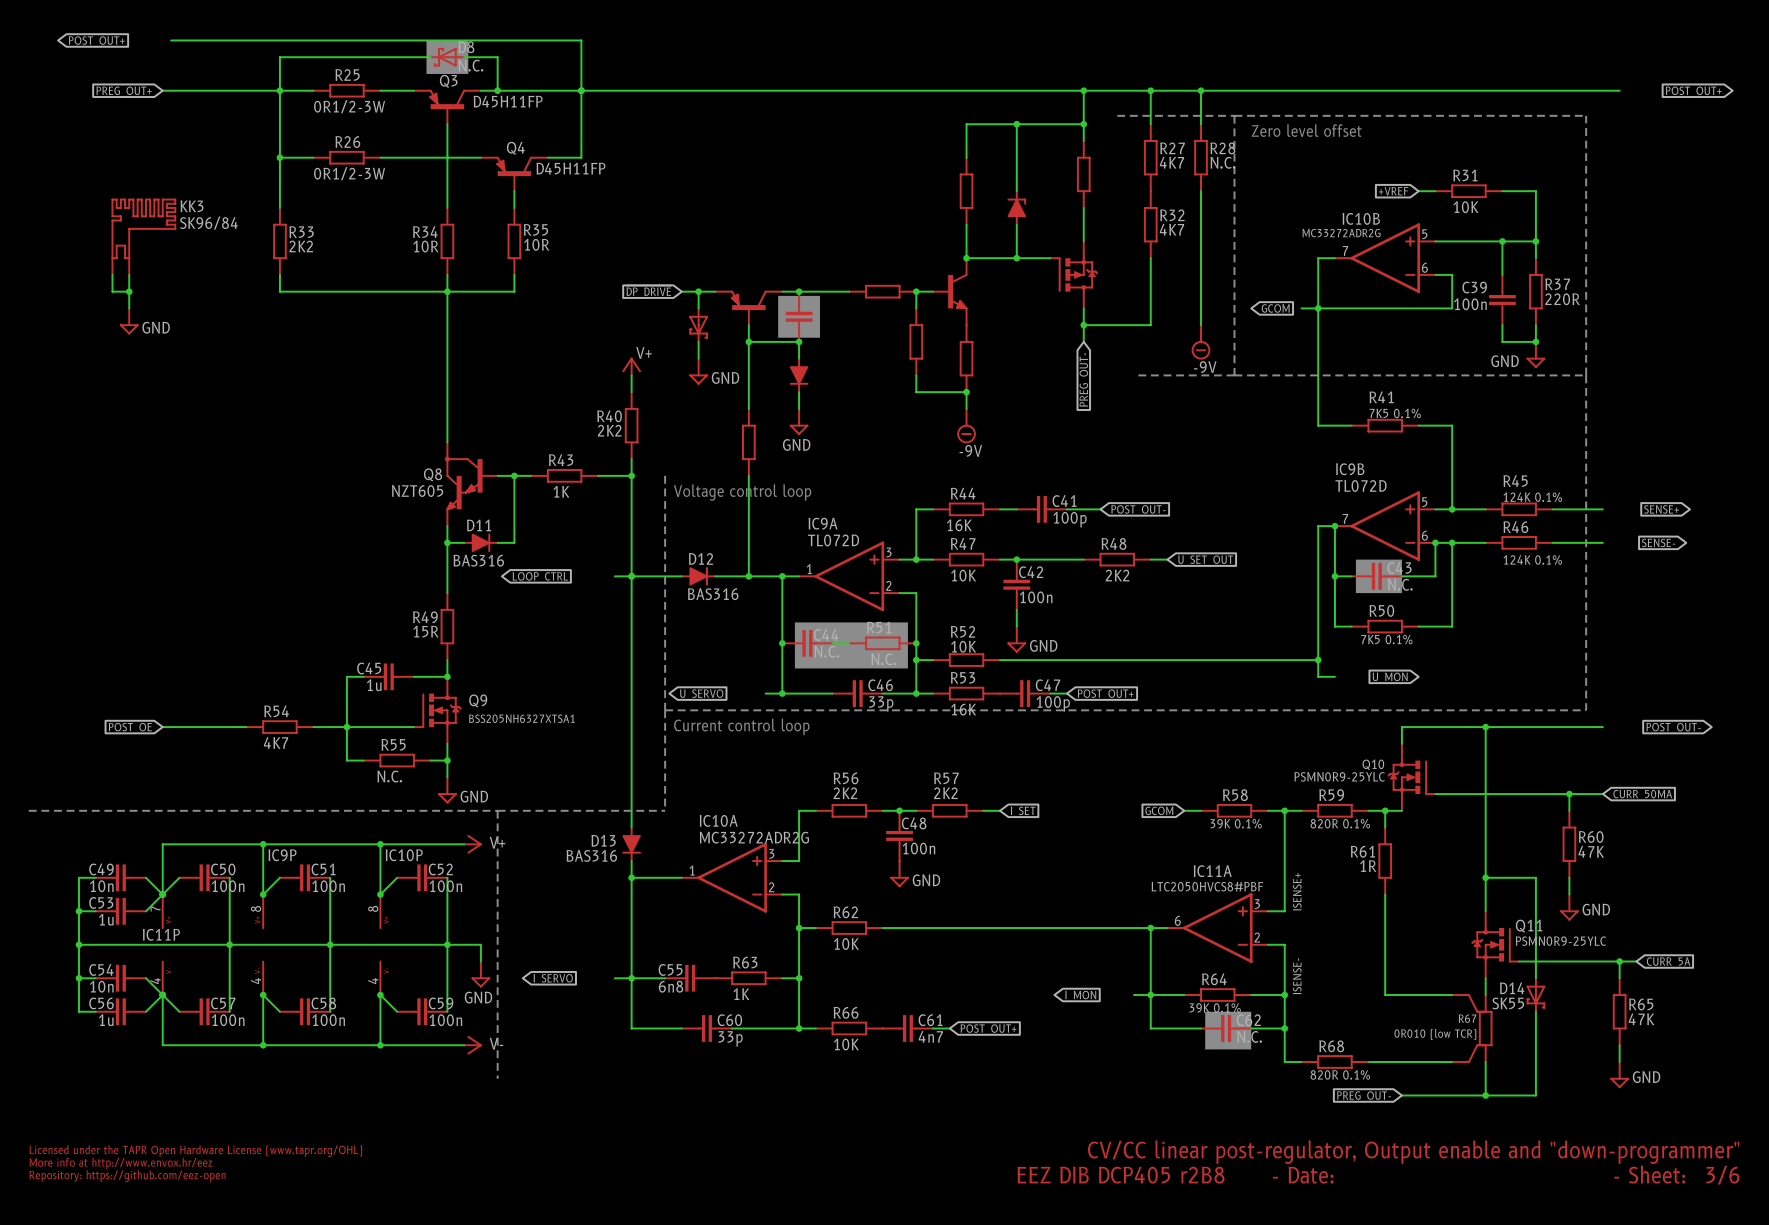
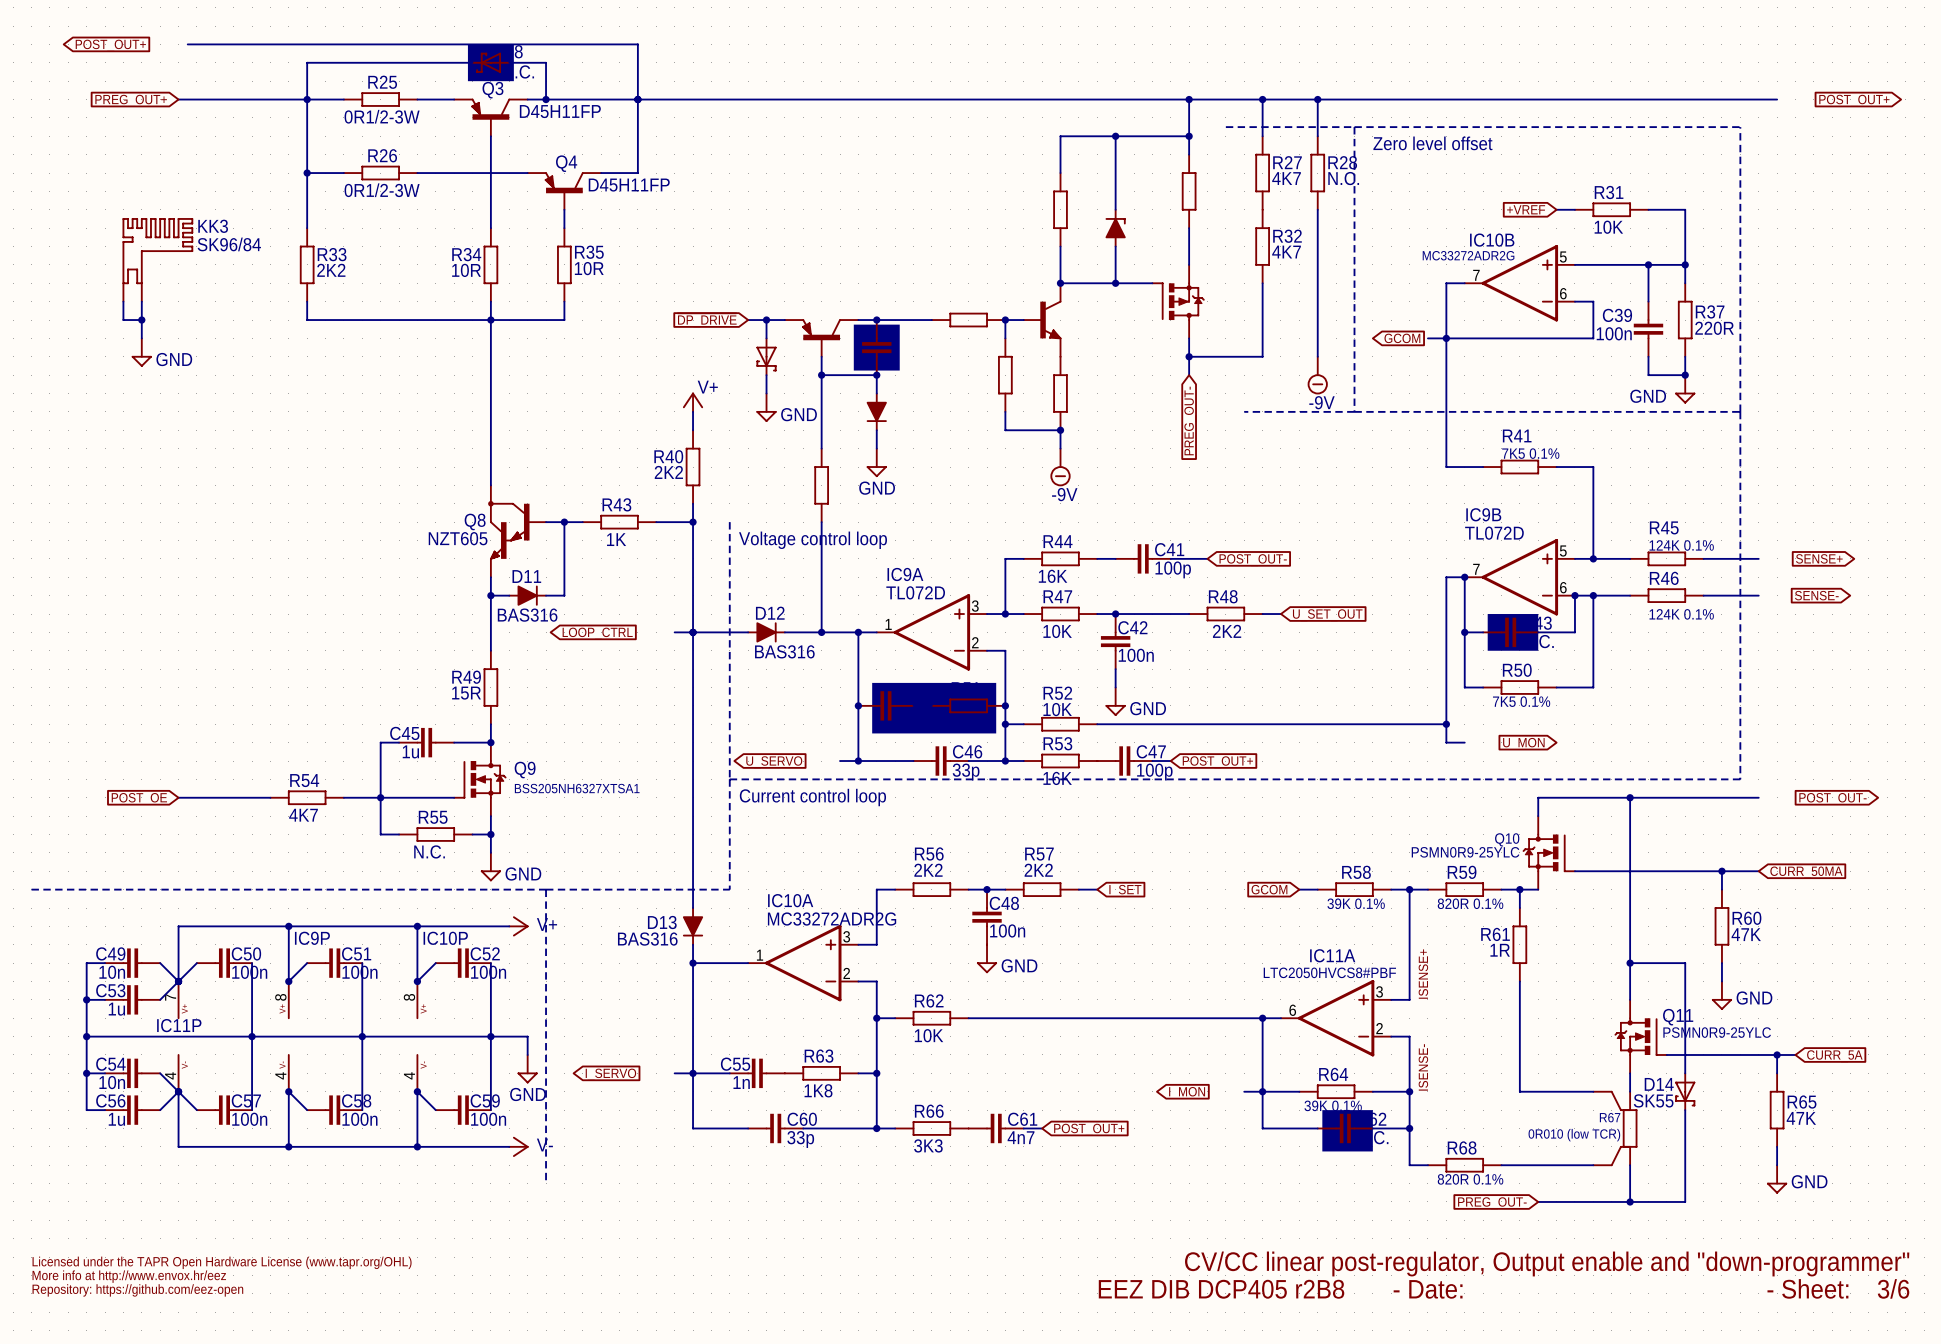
C55 value: 6n8 (671, 986) -> 1n (741, 1082)
R63 value: 1K (741, 994) -> 1K8 (818, 1090)
R66 value: 10K (846, 1044) -> 3K3 (928, 1145)

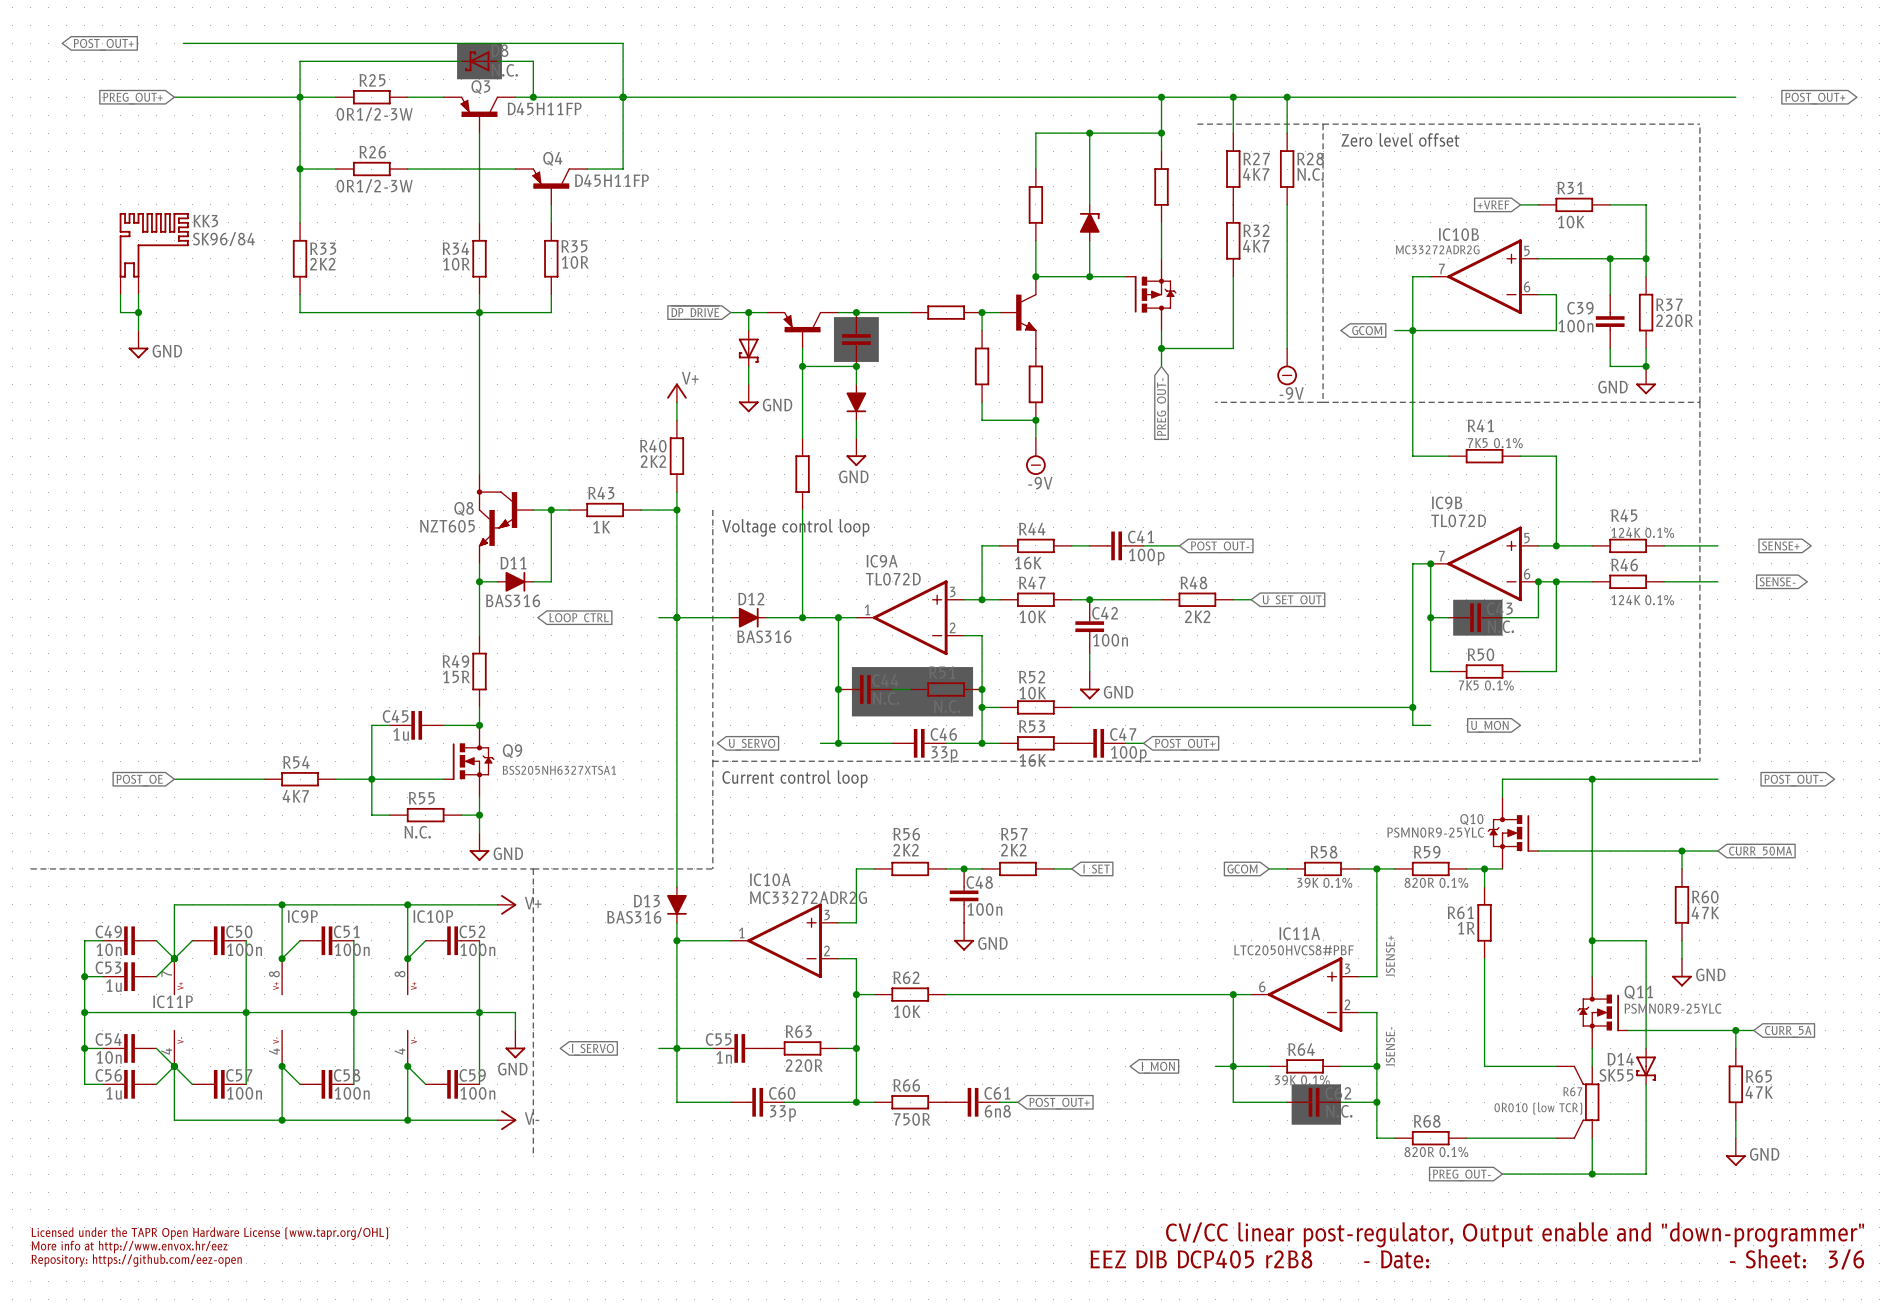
R63 value: 1K8 (818, 1090) -> 220R (804, 1065)
C61 value: 4n7 (1021, 1137) -> 6n8 (997, 1111)
R66 value: 3K3 (928, 1145) -> 750R (912, 1119)

